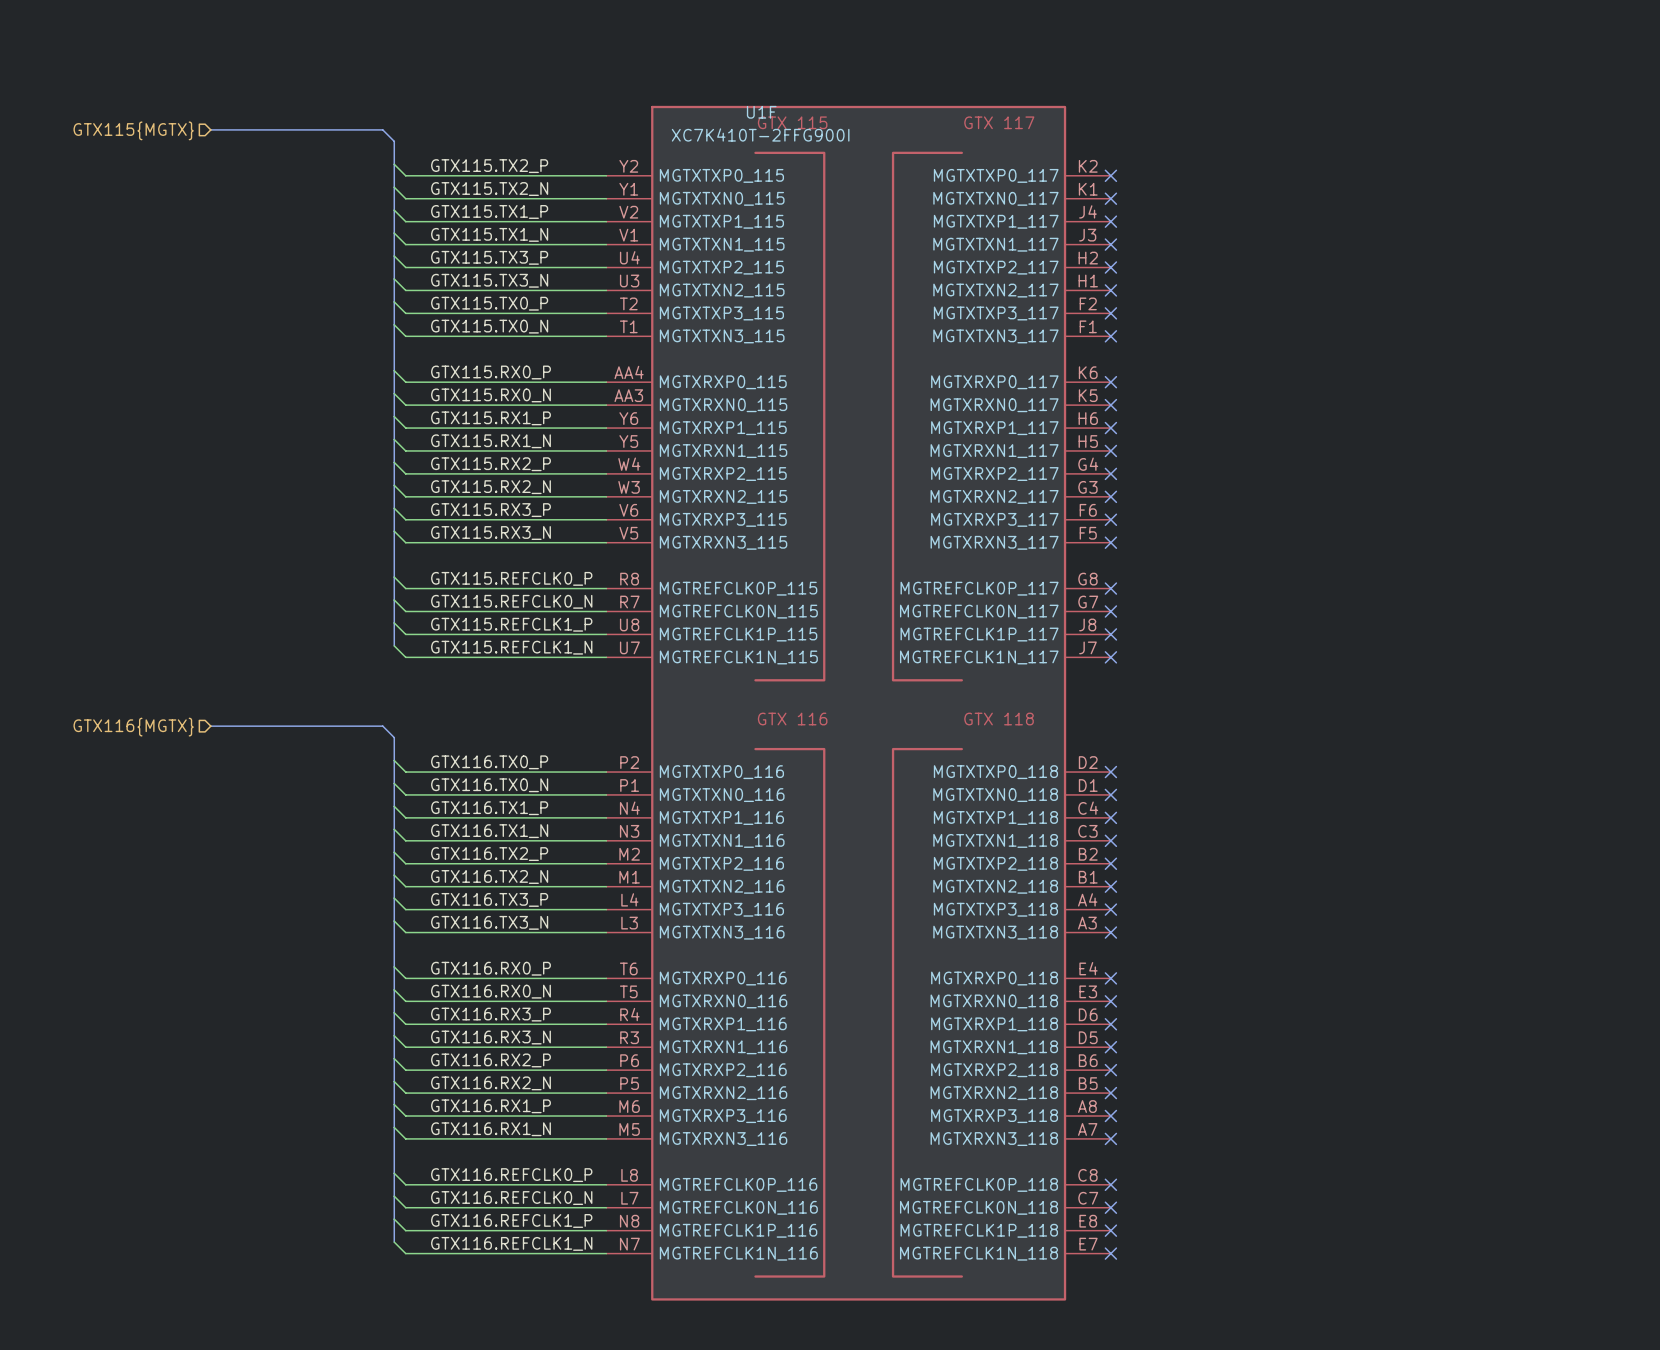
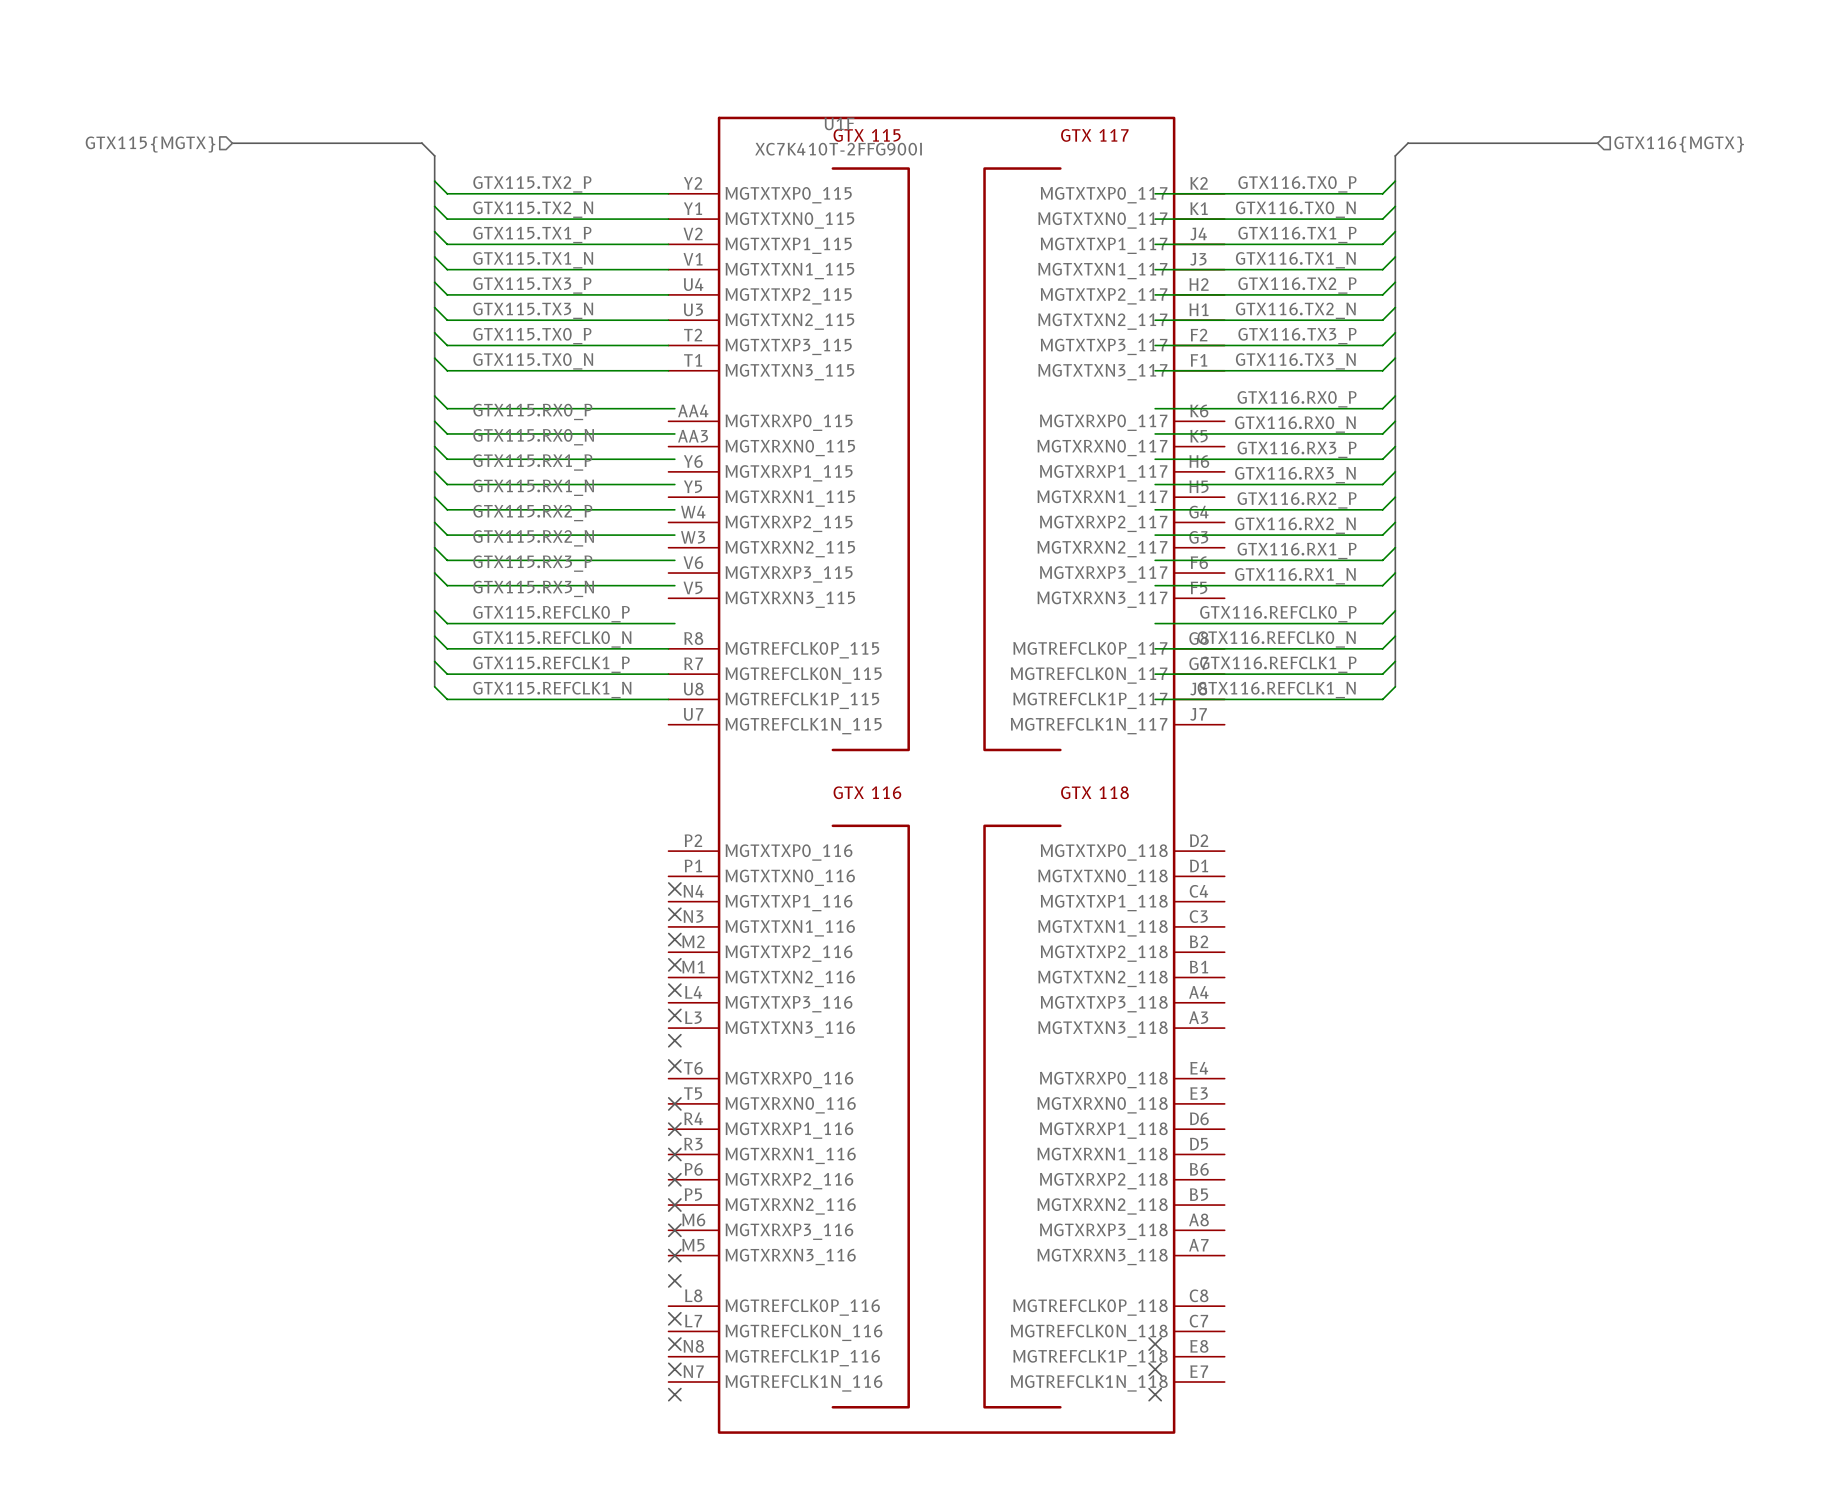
bus: none -> (1597, 143) (1407, 143) (1395, 155) (1395, 686)
hierarchical label: none -> GTX116{MGTX} (1679, 144)
wire: none -> (1395, 181) (1382, 193) (1155, 193)
label: none -> GTX116.TX0_P (1297, 184)
no-connect mark: (1110, 175) -> none
wire: none -> (1395, 206) (1382, 219) (1155, 219)
label: none -> GTX116.TX0_N (1295, 209)
no-connect mark: (1110, 198) -> none
wire: none -> (1395, 231) (1382, 244) (1155, 244)
label: none -> GTX116.TX1_P (1297, 234)
no-connect mark: (1110, 221) -> none
wire: none -> (1395, 257) (1382, 269) (1155, 269)
label: none -> GTX116.TX1_N (1295, 260)
no-connect mark: (1110, 244) -> none
wire: none -> (1395, 282) (1382, 294) (1155, 294)
label: none -> GTX116.TX2_P (1297, 285)
no-connect mark: (1110, 267) -> none
wire: none -> (1395, 307) (1382, 320) (1155, 320)
label: none -> GTX116.TX2_N (1295, 310)
no-connect mark: (1110, 290) -> none
wire: none -> (1395, 332) (1382, 345) (1155, 345)
label: none -> GTX116.TX3_P (1297, 336)
no-connect mark: (1110, 313) -> none
wire: none -> (1395, 358) (1382, 370) (1155, 370)
label: none -> GTX116.TX3_N (1295, 361)
no-connect mark: (1110, 336) -> none
wire: none -> (434, 396) (447, 408) (674, 408)
wire: none -> (1395, 396) (1382, 408) (1155, 408)
label: none -> GTX116.RX0_P (1297, 399)
wire: (394, 370) (405, 382) (606, 382) -> none
wire: none -> (434, 421) (447, 433) (674, 433)
no-connect mark: (1110, 382) -> none
wire: none -> (1395, 421) (1382, 433) (1155, 433)
label: none -> GTX116.RX0_N (1295, 424)
wire: (394, 393) (405, 405) (606, 405) -> none
wire: none -> (434, 446) (447, 459) (674, 459)
no-connect mark: (1110, 405) -> none
wire: none -> (1395, 446) (1382, 459) (1155, 459)
label: none -> GTX116.RX3_P (1297, 449)
wire: (394, 416) (405, 428) (606, 428) -> none
wire: none -> (434, 471) (447, 484) (674, 484)
no-connect mark: (1110, 428) -> none
wire: none -> (1395, 471) (1382, 484) (1155, 484)
label: none -> GTX116.RX3_N (1295, 475)
wire: (394, 439) (405, 450) (606, 450) -> none
wire: none -> (434, 497) (447, 509) (674, 509)
no-connect mark: (1110, 450) -> none
wire: none -> (1395, 497) (1382, 509) (1155, 509)
label: none -> GTX116.RX2_P (1297, 500)
wire: (394, 462) (405, 473) (606, 473) -> none
wire: none -> (434, 522) (447, 535) (674, 535)
no-connect mark: (1110, 473) -> none
wire: none -> (1395, 522) (1382, 535) (1155, 535)
label: none -> GTX116.RX2_N (1295, 525)
wire: (394, 485) (405, 496) (606, 496) -> none
wire: none -> (434, 547) (447, 560) (674, 560)
no-connect mark: (1110, 496) -> none
wire: none -> (1395, 547) (1382, 560) (1155, 560)
label: none -> GTX116.RX1_P (1297, 550)
wire: (394, 508) (405, 519) (606, 519) -> none
wire: none -> (434, 573) (447, 585) (674, 585)
no-connect mark: (1110, 519) -> none
wire: none -> (1395, 573) (1382, 585) (1155, 585)
label: none -> GTX116.RX1_N (1295, 576)
wire: (394, 531) (405, 542) (606, 542) -> none
no-connect mark: (1110, 542) -> none
wire: none -> (434, 610) (447, 623) (674, 623)
wire: none -> (1395, 610) (1382, 623) (1155, 623)
label: none -> GTX115.REFCLK0_P (551, 614)
label: none -> GTX116.REFCLK0_P (1278, 614)
wire: none -> (1395, 636) (1382, 648) (1155, 648)
label: GTX115.REFCLK0_P (511, 578) -> GTX115.REFCLK0_N (552, 639)
label: none -> GTX116.REFCLK0_N (1276, 639)
no-connect mark: (1110, 588) -> none
wire: none -> (1395, 661) (1382, 674) (1155, 674)
label: GTX115.REFCLK0_N (511, 601) -> GTX115.REFCLK1_P (551, 664)
label: none -> GTX116.REFCLK1_P (1278, 664)
no-connect mark: (1110, 611) -> none
bus: (394, 622) (394, 645) -> none
wire: none -> (1395, 686) (1382, 699) (1155, 699)
label: GTX115.REFCLK1_P (511, 624) -> GTX115.REFCLK1_N (552, 690)
label: none -> GTX116.REFCLK1_N (1276, 690)
no-connect mark: (1110, 634) -> none
wire: (394, 645) (405, 657) (606, 657) -> none
label: GTX115.REFCLK1_N (511, 647) -> none
no-connect mark: (1110, 657) -> none
bus: (210, 726) (382, 726) (394, 737) (394, 1242) -> none
hierarchical label: GTX116{MGTX} (133, 727) -> none
wire: (394, 760) (405, 772) (606, 772) -> none
label: GTX116.TX0_P (489, 762) -> none
no-connect mark: (1110, 772) -> none
wire: (394, 783) (405, 794) (606, 794) -> none
label: GTX116.TX0_N (489, 785) -> none
no-connect mark: (1110, 794) -> none
wire: (394, 806) (405, 817) (606, 817) -> none
no-connect mark: none -> (674, 889)
label: GTX116.TX1_P (489, 808) -> none
no-connect mark: (1110, 817) -> none
wire: (394, 829) (405, 840) (606, 840) -> none
no-connect mark: none -> (674, 914)
label: GTX116.TX1_N (489, 831) -> none
no-connect mark: (1110, 840) -> none
wire: (394, 852) (405, 863) (606, 863) -> none
no-connect mark: none -> (674, 939)
label: GTX116.TX2_P (489, 854) -> none
no-connect mark: (1110, 863) -> none
wire: (394, 875) (405, 886) (606, 886) -> none
no-connect mark: none -> (674, 964)
label: GTX116.TX2_N (489, 876) -> none
no-connect mark: (1110, 886) -> none
wire: (394, 898) (405, 909) (606, 909) -> none
no-connect mark: none -> (674, 990)
label: GTX116.TX3_P (489, 899) -> none
no-connect mark: (1110, 909) -> none
wire: (394, 921) (405, 932) (606, 932) -> none
no-connect mark: none -> (674, 1015)
label: GTX116.TX3_N (489, 922) -> none
no-connect mark: (1110, 932) -> none
no-connect mark: none -> (674, 1040)
wire: (394, 966) (405, 978) (606, 978) -> none
no-connect mark: none -> (674, 1065)
label: GTX116.RX0_P (491, 968) -> none
no-connect mark: (1110, 978) -> none
wire: (394, 989) (405, 1001) (606, 1001) -> none
label: GTX116.RX0_N (491, 991) -> none
no-connect mark: none -> (674, 1103)
no-connect mark: (1110, 1001) -> none
wire: (394, 1012) (405, 1024) (606, 1024) -> none
label: GTX116.RX3_P (491, 1014) -> none
no-connect mark: none -> (674, 1129)
no-connect mark: (1110, 1024) -> none
wire: (394, 1035) (405, 1047) (606, 1047) -> none
label: GTX116.RX3_N (491, 1037) -> none
no-connect mark: none -> (674, 1154)
no-connect mark: (1110, 1047) -> none
wire: (394, 1058) (405, 1070) (606, 1070) -> none
label: GTX116.RX2_P (491, 1060) -> none
no-connect mark: none -> (674, 1179)
no-connect mark: (1110, 1070) -> none
wire: (394, 1081) (405, 1093) (606, 1093) -> none
label: GTX116.RX2_N (491, 1083) -> none
no-connect mark: none -> (674, 1205)
no-connect mark: (1110, 1093) -> none
wire: (394, 1104) (405, 1116) (606, 1116) -> none
label: GTX116.RX1_P (491, 1106) -> none
no-connect mark: none -> (674, 1230)
no-connect mark: (1110, 1116) -> none
wire: (394, 1127) (405, 1138) (606, 1138) -> none
label: GTX116.RX1_N (491, 1129) -> none
no-connect mark: none -> (674, 1255)
no-connect mark: (1110, 1138) -> none
no-connect mark: none -> (674, 1280)
wire: (394, 1173) (405, 1184) (606, 1184) -> none
label: GTX116.REFCLK0_P (511, 1175) -> none
no-connect mark: (1110, 1184) -> none
wire: (394, 1196) (405, 1207) (606, 1207) -> none
no-connect mark: none -> (674, 1318)
label: GTX116.REFCLK0_N (511, 1198) -> none
no-connect mark: (1110, 1207) -> none
wire: (394, 1219) (405, 1230) (606, 1230) -> none
no-connect mark: none -> (674, 1344)
no-connect mark: none -> (1155, 1344)
label: GTX116.REFCLK1_P (511, 1220) -> none
no-connect mark: (1110, 1230) -> none
wire: (394, 1242) (405, 1253) (606, 1253) -> none
no-connect mark: none -> (674, 1369)
no-connect mark: none -> (1155, 1369)
label: GTX116.REFCLK1_N (511, 1243) -> none
no-connect mark: (1110, 1253) -> none
no-connect mark: none -> (674, 1394)
no-connect mark: none -> (1155, 1394)

